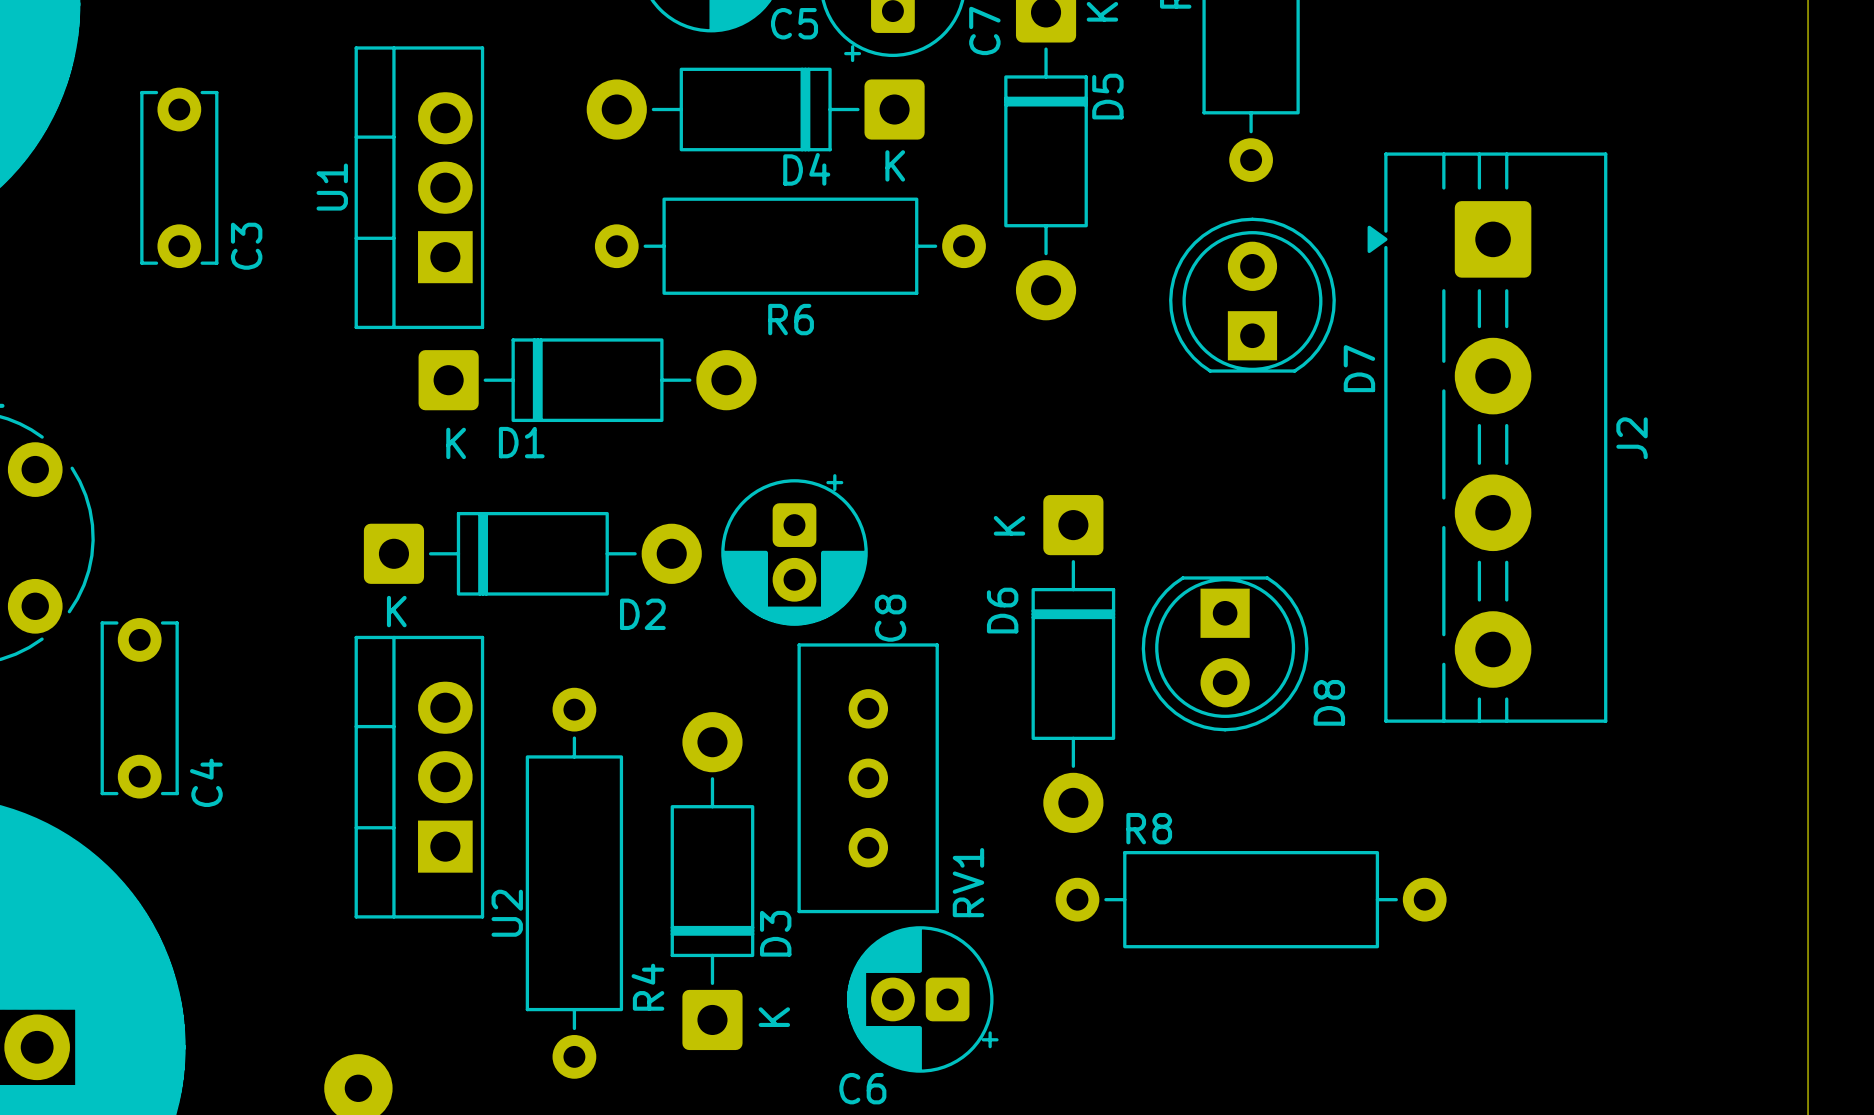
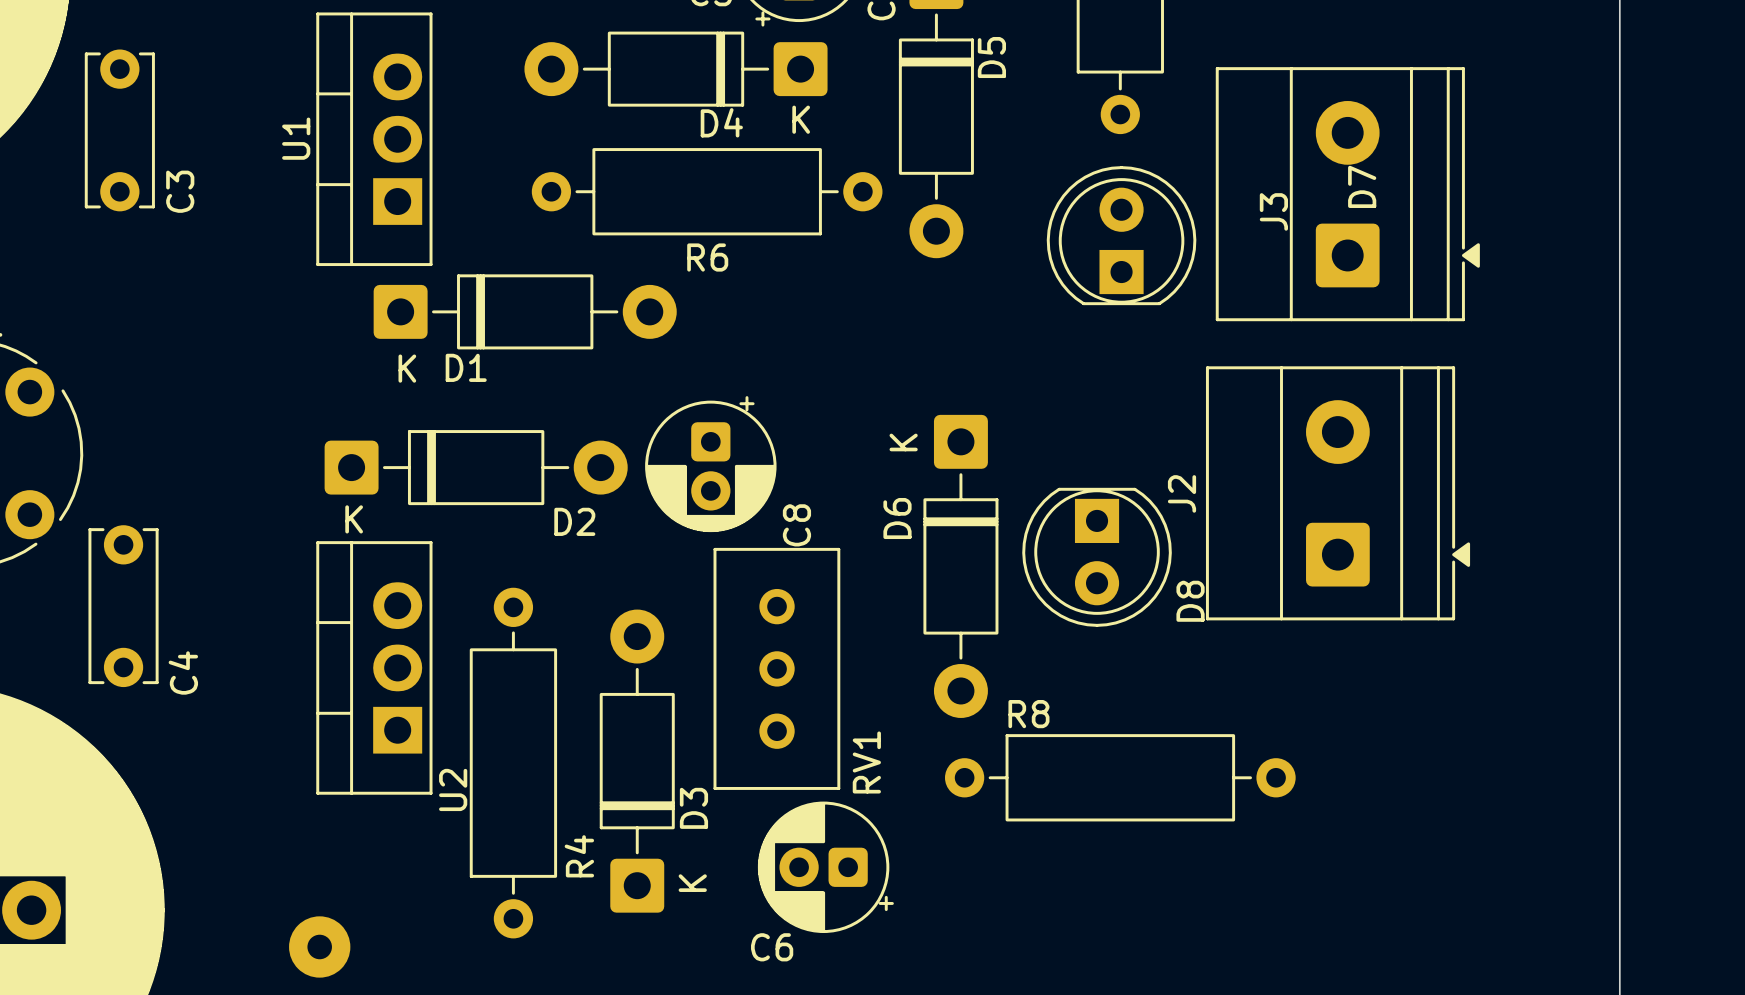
J2 footprint: [1367, 152, 1608, 723] -> [1205, 366, 1471, 621]
C3 position: (179, 177) -> (119, 130)
J3: none -> (1347, 194)
D7 name position: D7 (1359, 368) -> D7 (1362, 186)
J2 name position: J2 (1632, 438) -> J2 (1182, 493)

